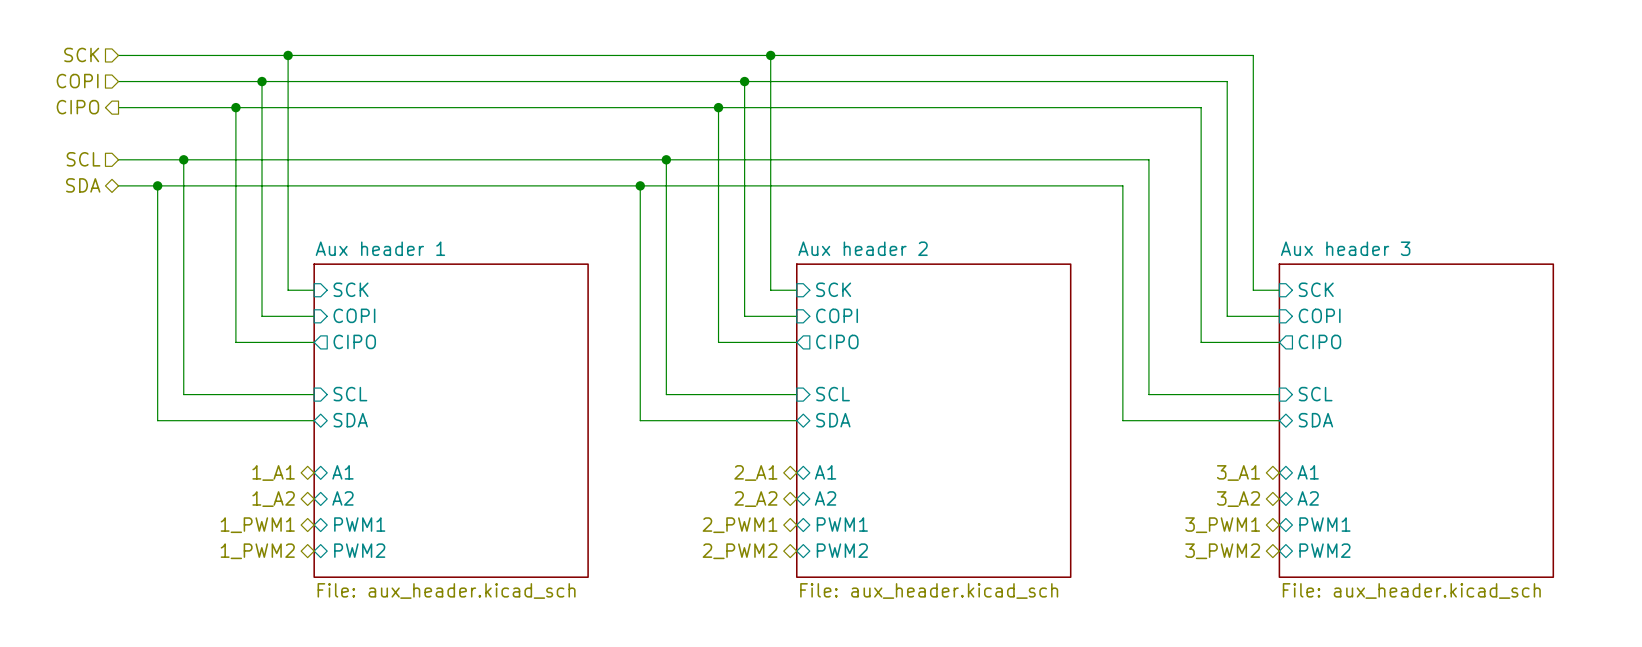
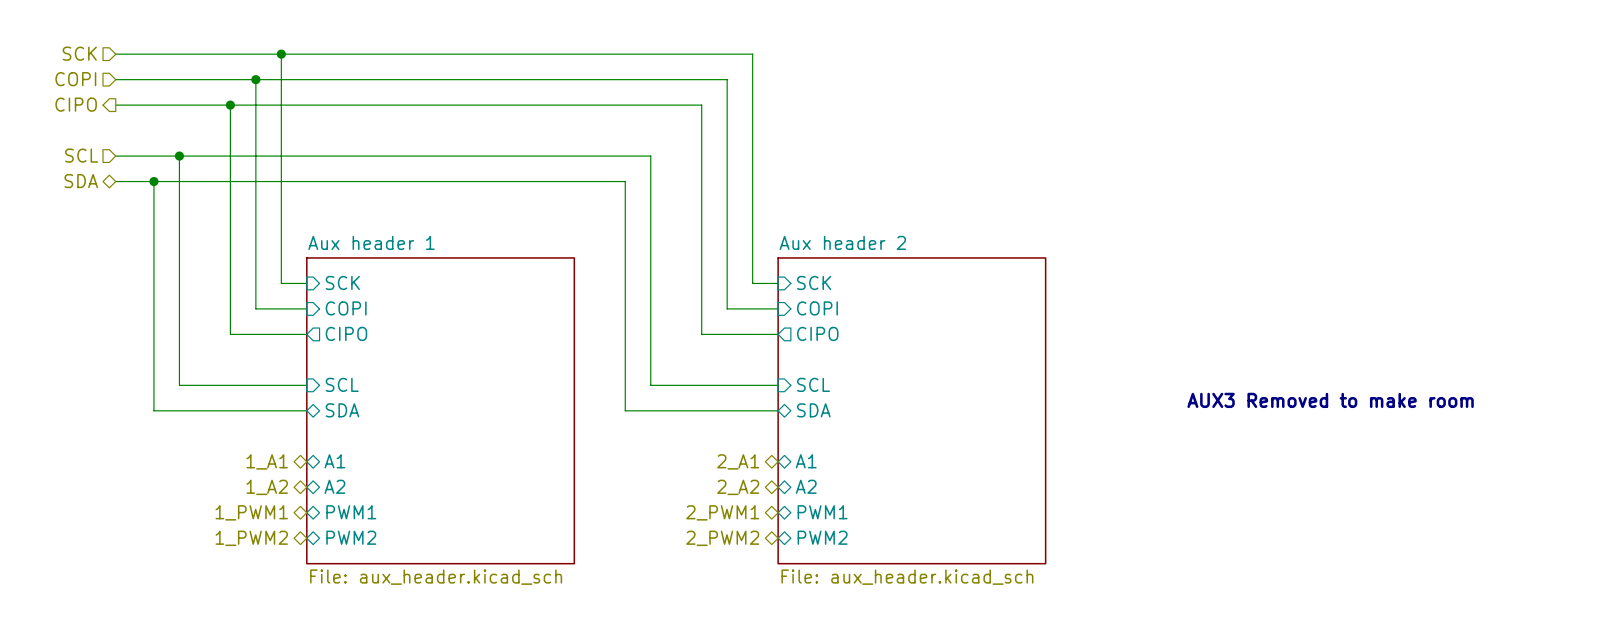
wire: (770, 55) (1253, 55) (1253, 290) (1279, 290) -> none
junction: (770, 55) -> none
wire: (744, 81) (1227, 81) (1227, 316) (1279, 316) -> none
junction: (744, 81) -> none
wire: (718, 107) (1201, 107) (1201, 342) (1279, 342) -> none
junction: (718, 107) -> none
wire: (666, 159) (1148, 159) (1148, 394) (1279, 394) -> none
junction: (666, 159) -> none
wire: (640, 185) (1122, 185) (1122, 420) (1279, 420) -> none
junction: (640, 185) -> none
sheet pin: SCK (1316, 289) -> none
sheet pin: COPI (1319, 315) -> none
sheet pin: CIPO (1319, 341) -> none
sheet pin: SCL (1315, 394) -> none
text: none -> AUX3 Removed to make room (1330, 400)
sheet pin: SDA (1315, 420) -> none
sheet Aux header 3: File: aux_header.kicad_sch (1416, 420) -> none
hierarchical label: 3_A1 (1238, 472) -> none
sheet pin: A1 (1308, 472) -> none
sheet pin: A2 (1308, 498) -> none
hierarchical label: 3_A2 (1238, 499) -> none
sheet pin: PWM1 (1324, 524) -> none
hierarchical label: 3_PWM1 (1222, 525) -> none
sheet pin: PWM2 (1324, 550) -> none
hierarchical label: 3_PWM2 (1222, 551) -> none

